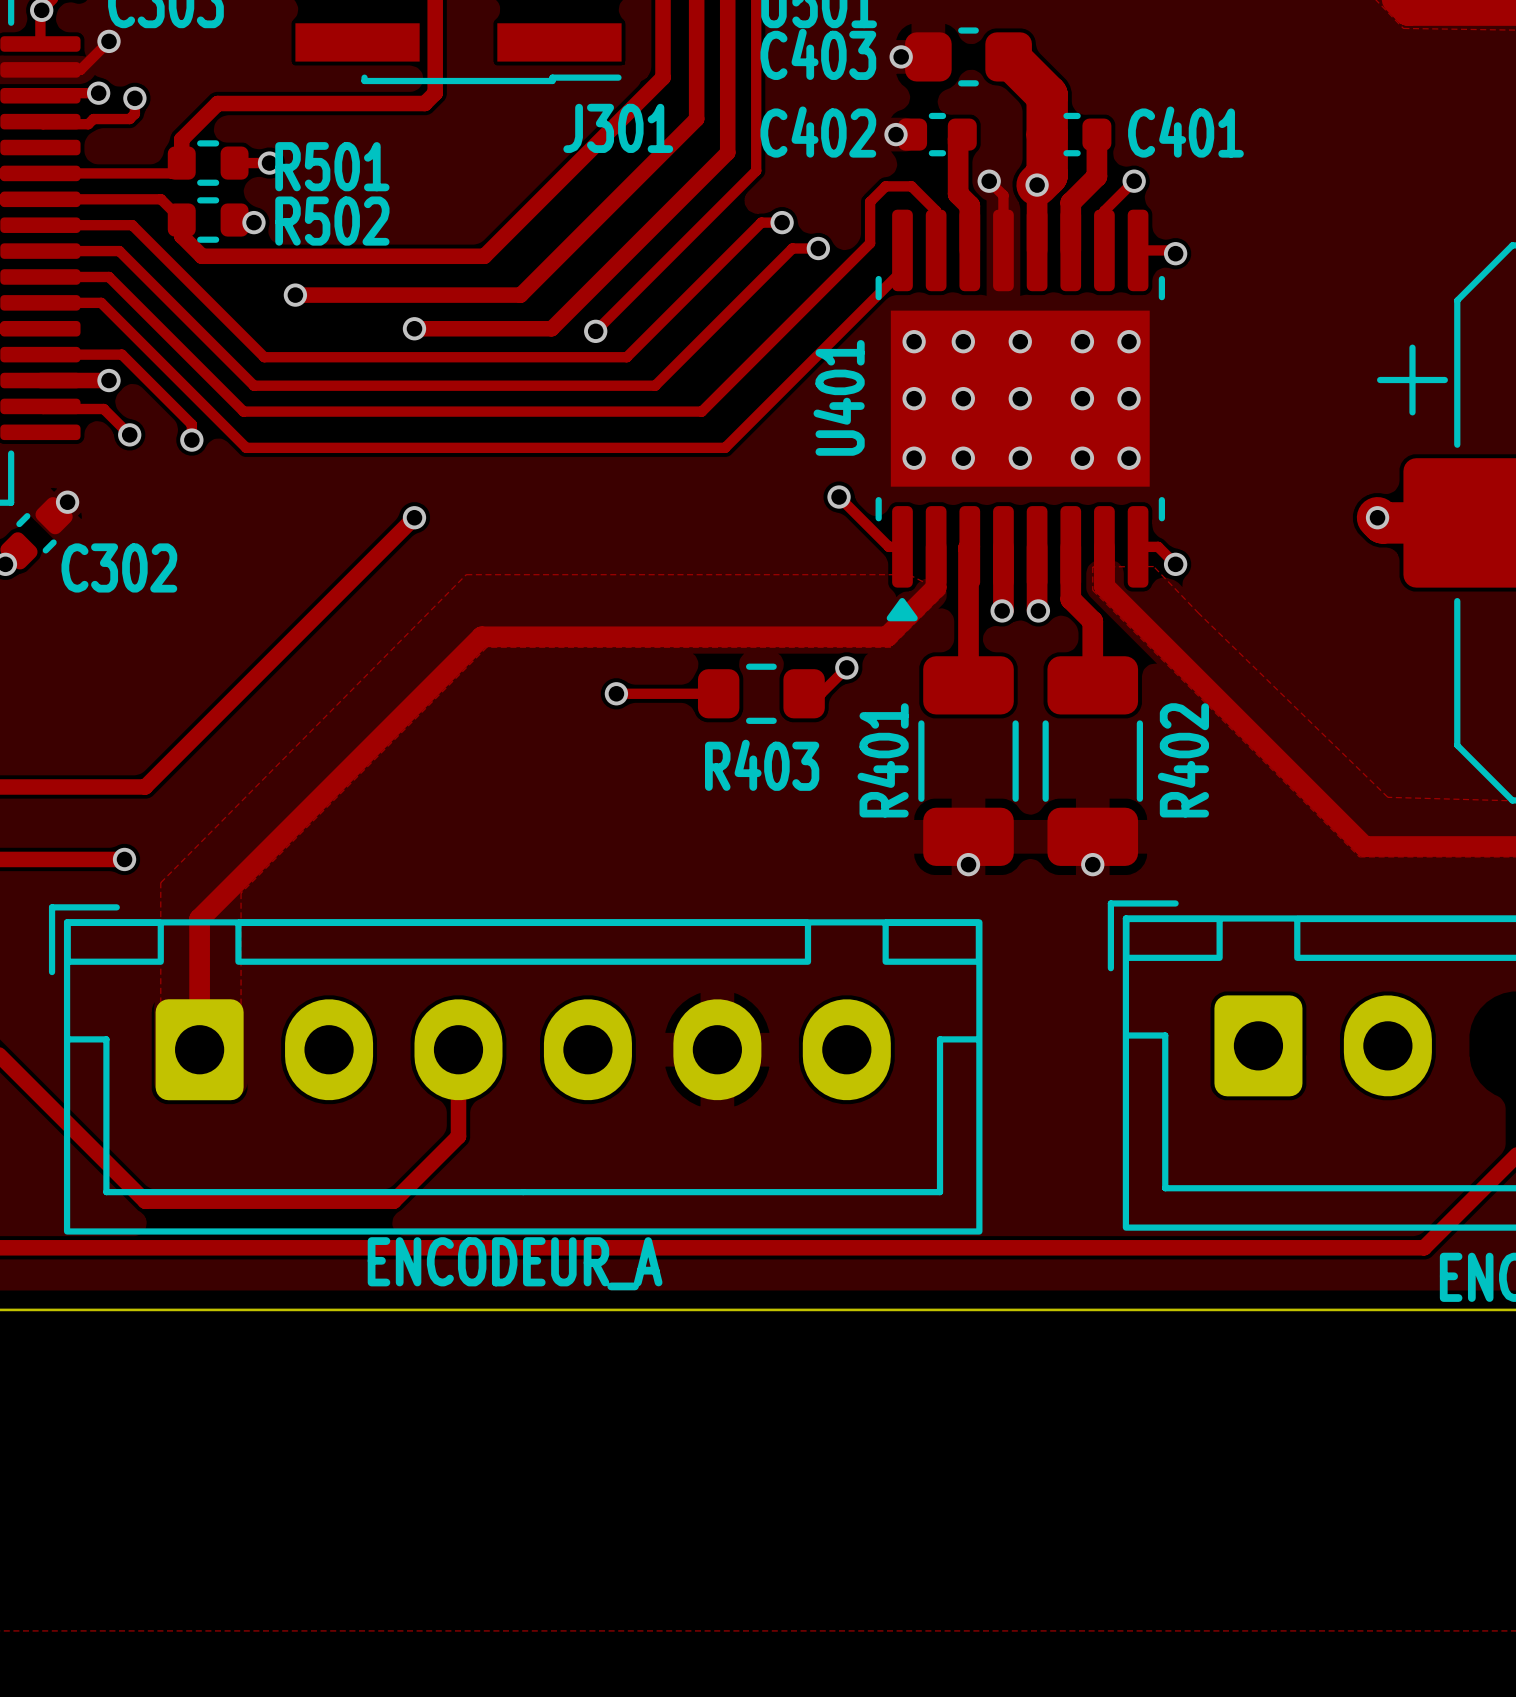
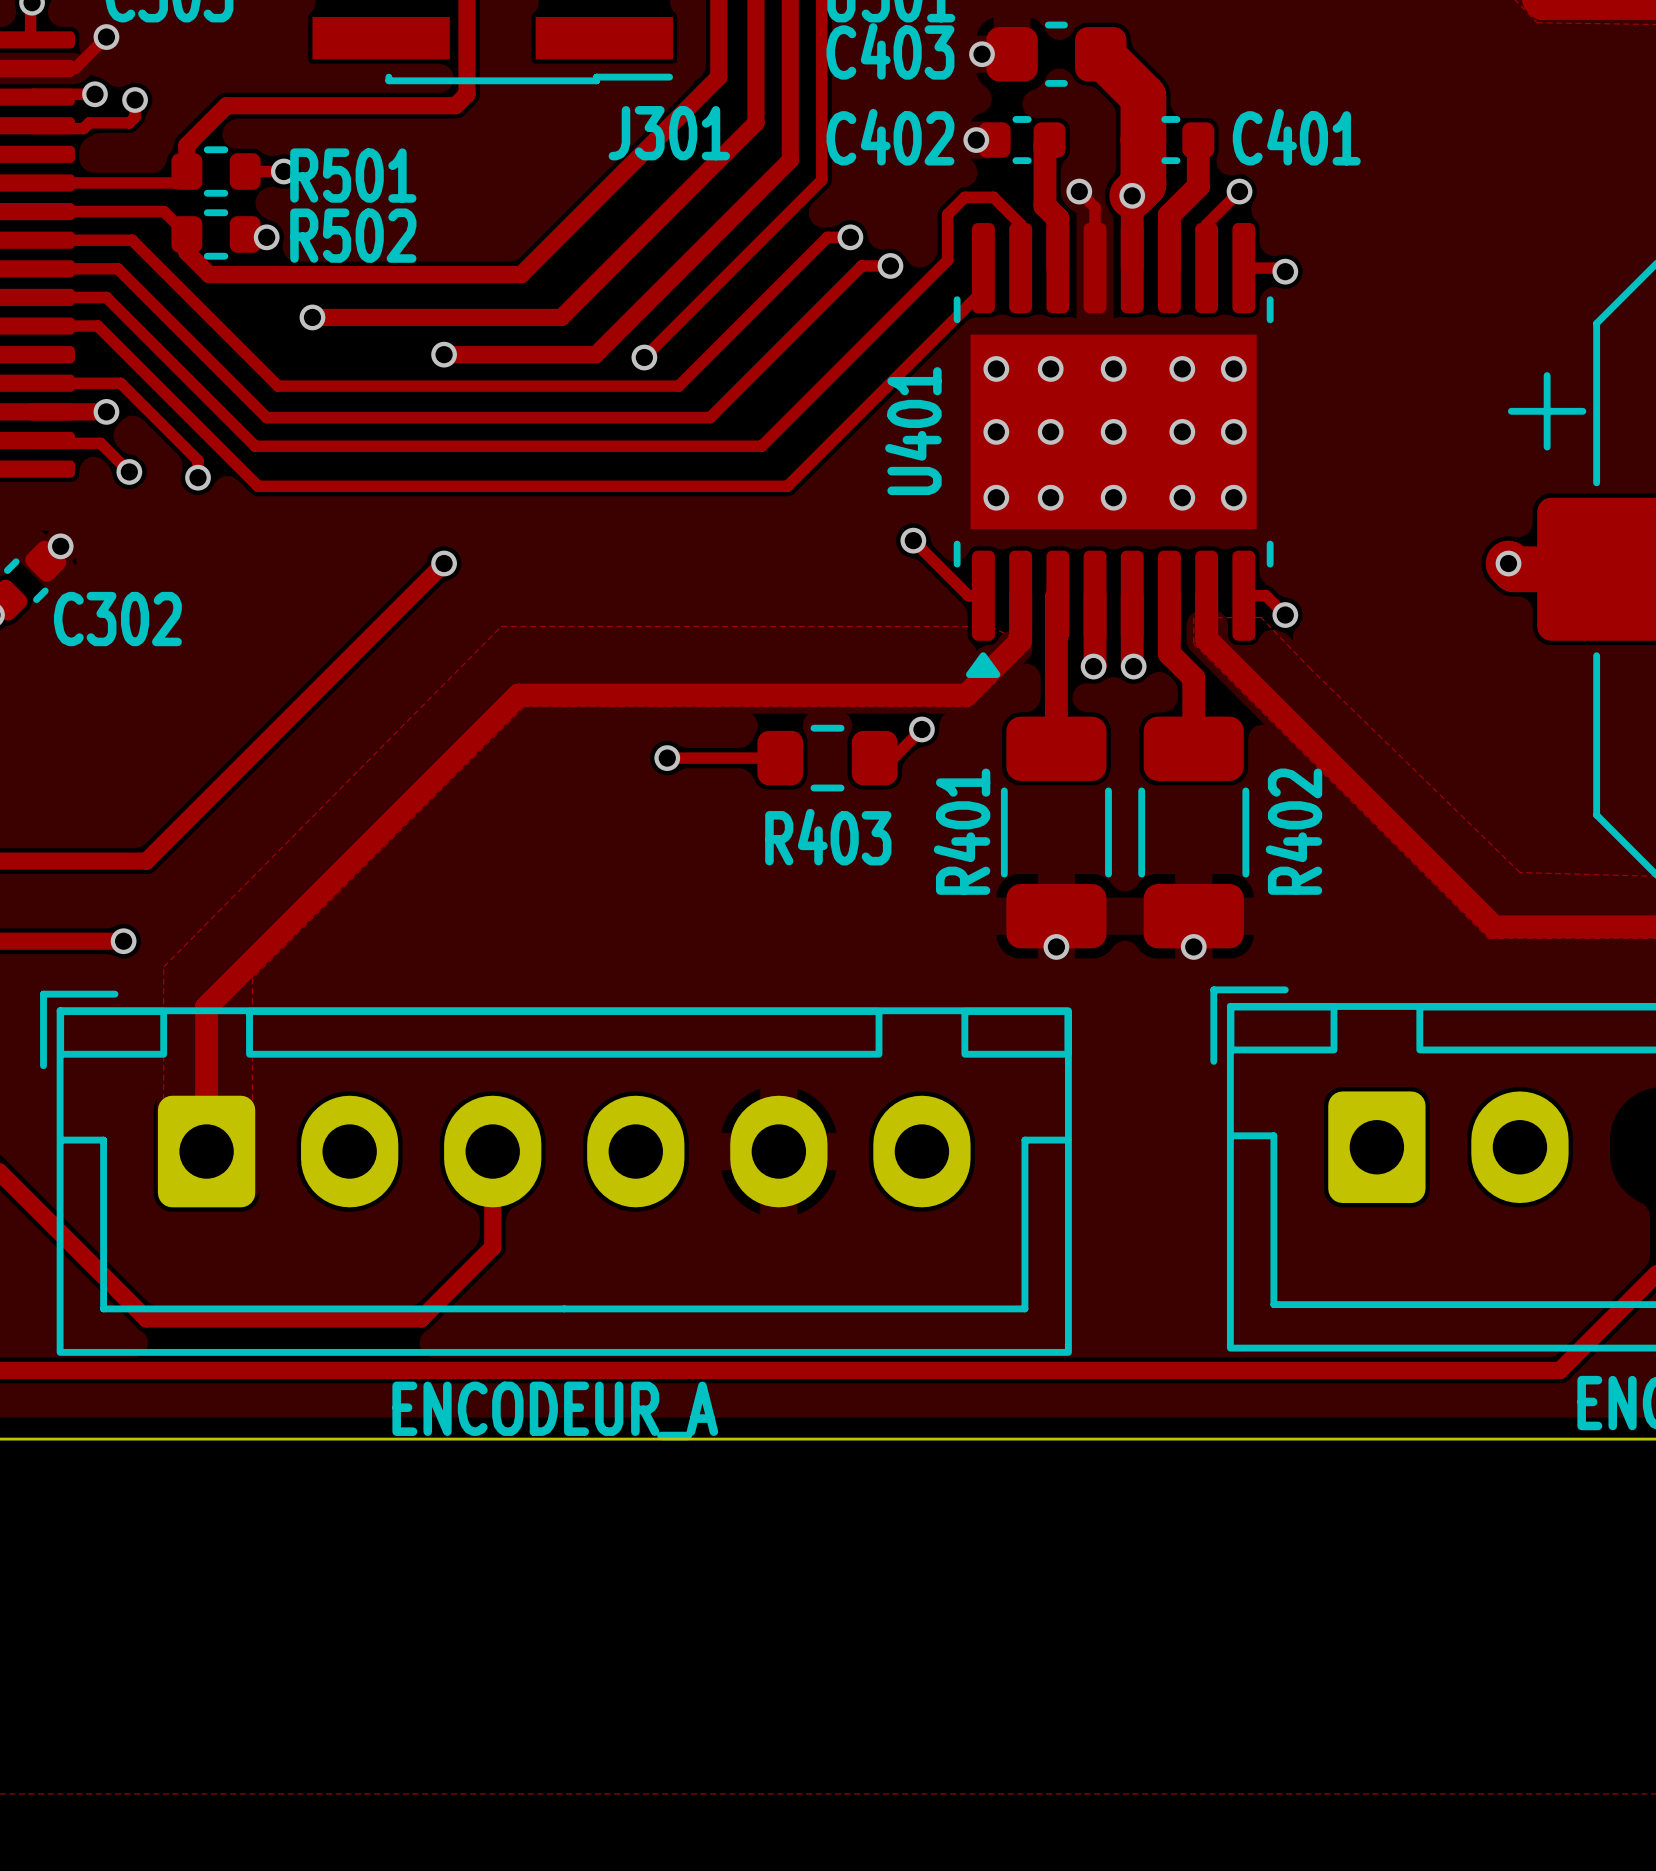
ENCODEUR_A name position: ENCODEUR_A (515, 1263) -> ENCODEUR_A (555, 1410)

